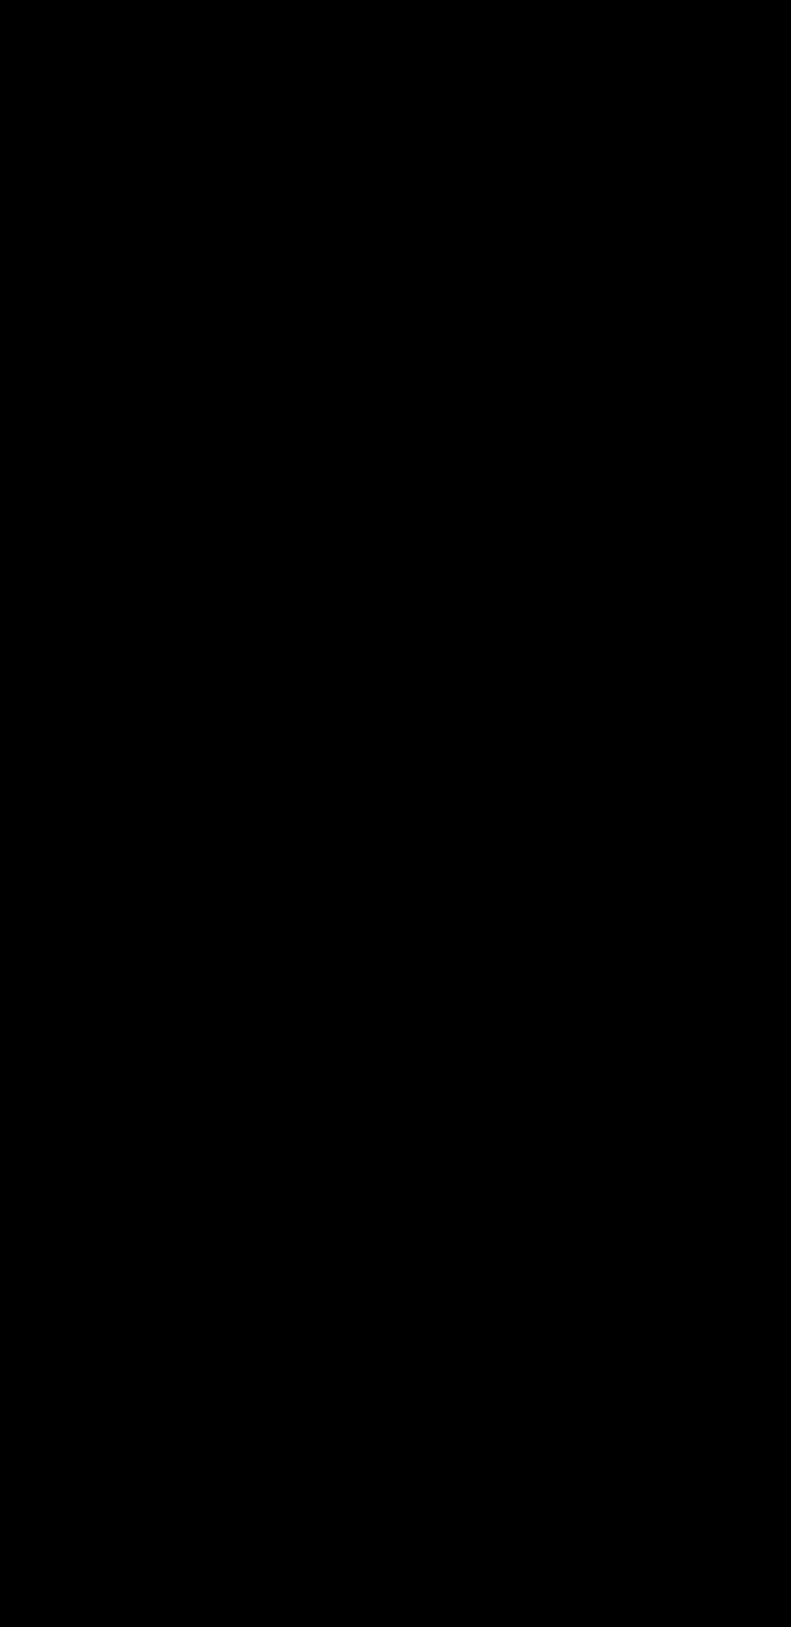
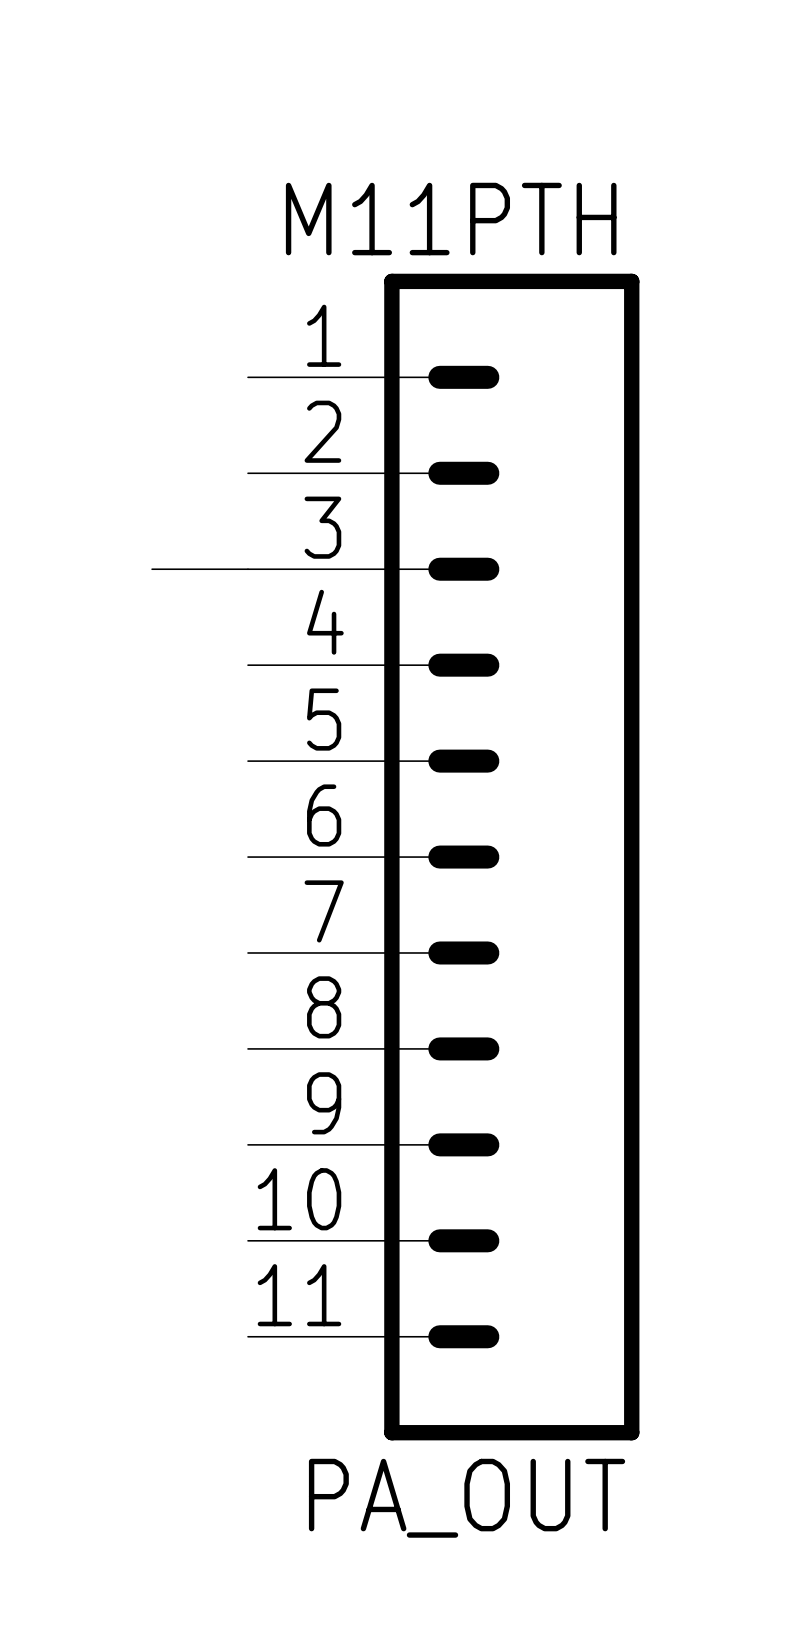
wire: none -> (152, 569) (247, 569)
PA_OUT: none -> M11PTH (443, 857)

